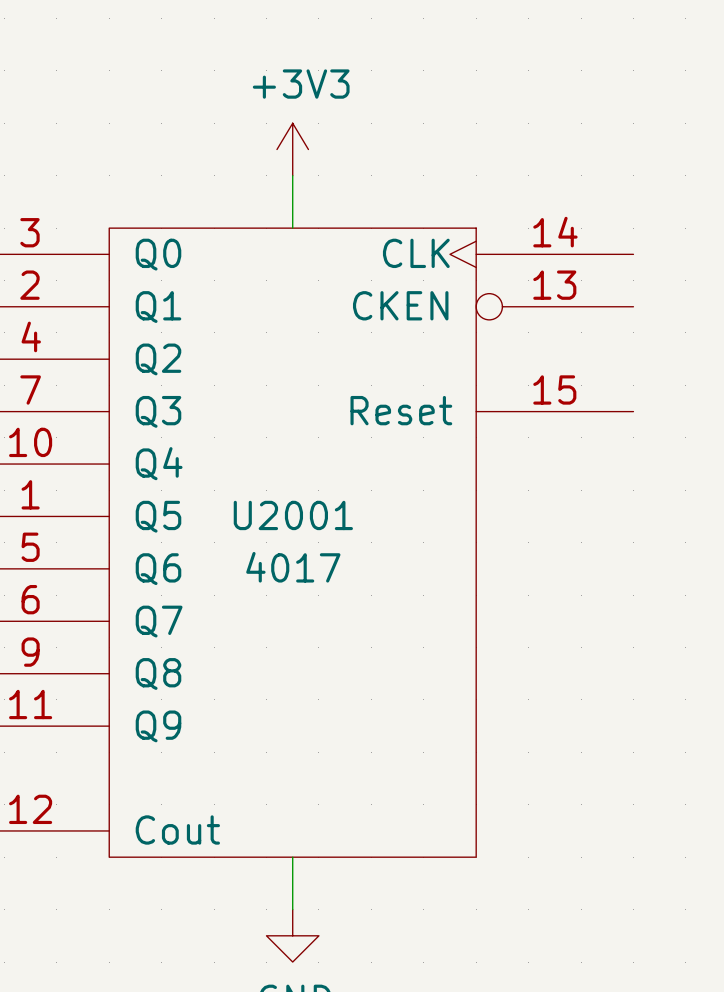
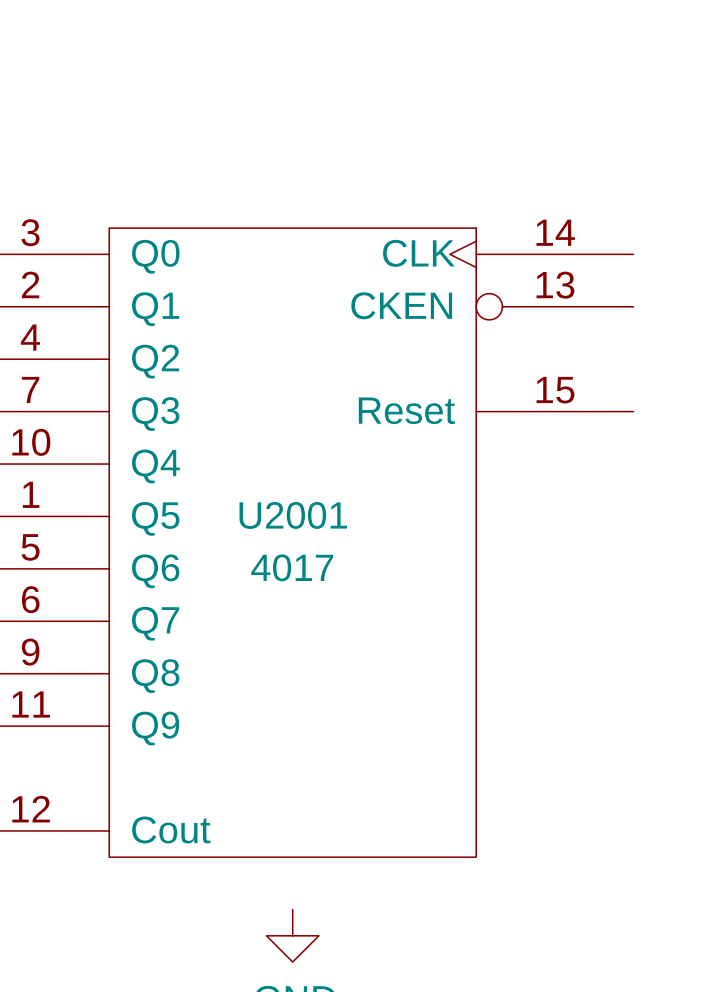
power symbol: +3V3 (292, 149) -> none
wire: (292, 175) (292, 228) -> none
wire: (292, 857) (292, 909) -> none

